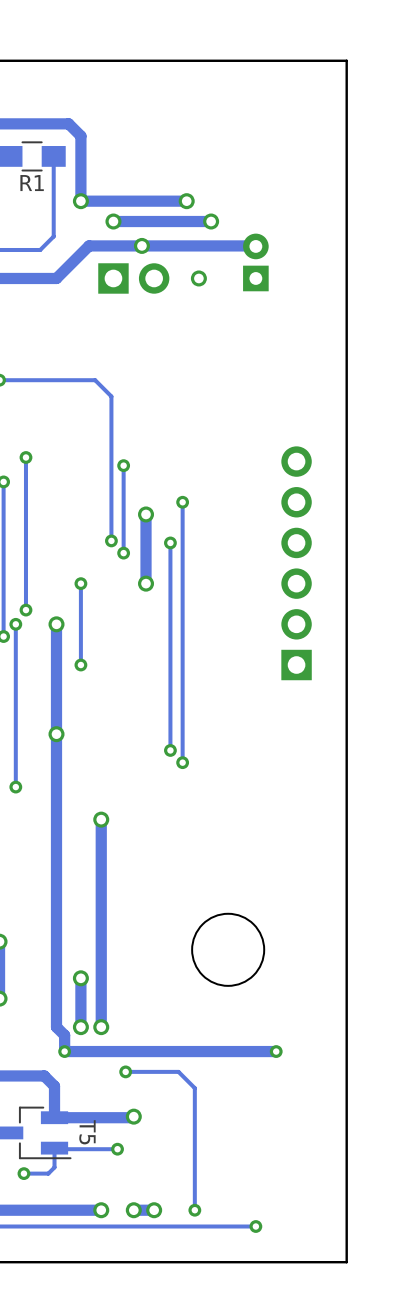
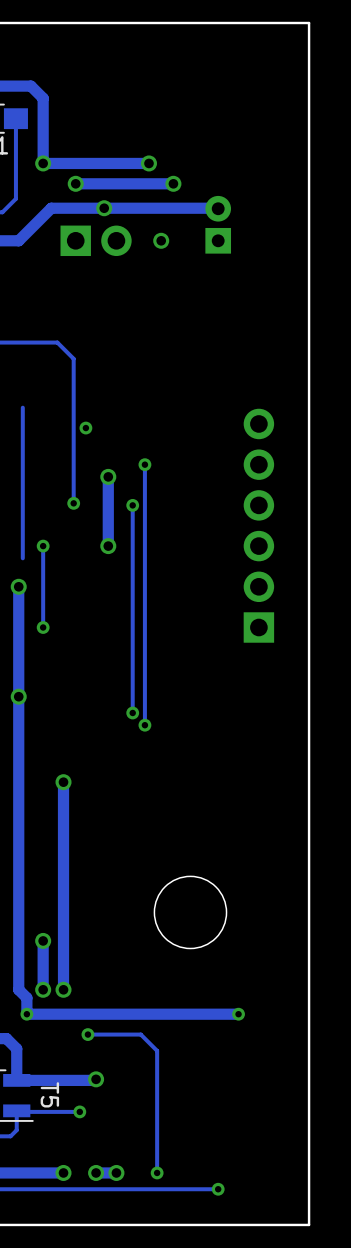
track: none -> (22, 407) (22, 558)
track: (123, 465) (123, 553) -> none
via: (123, 553) -> none

